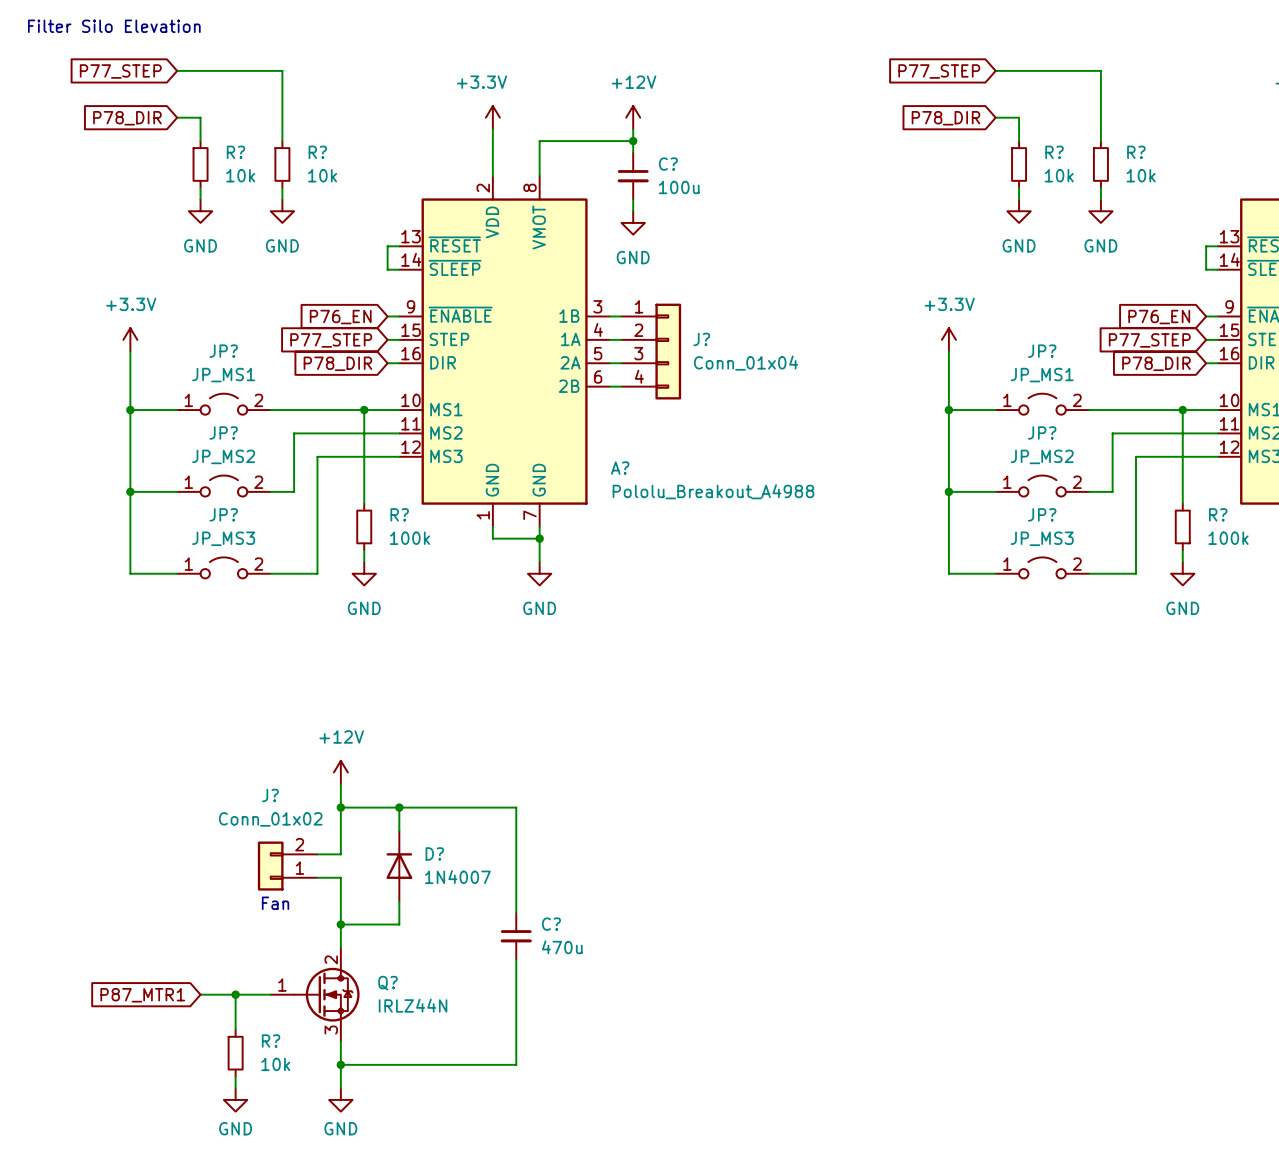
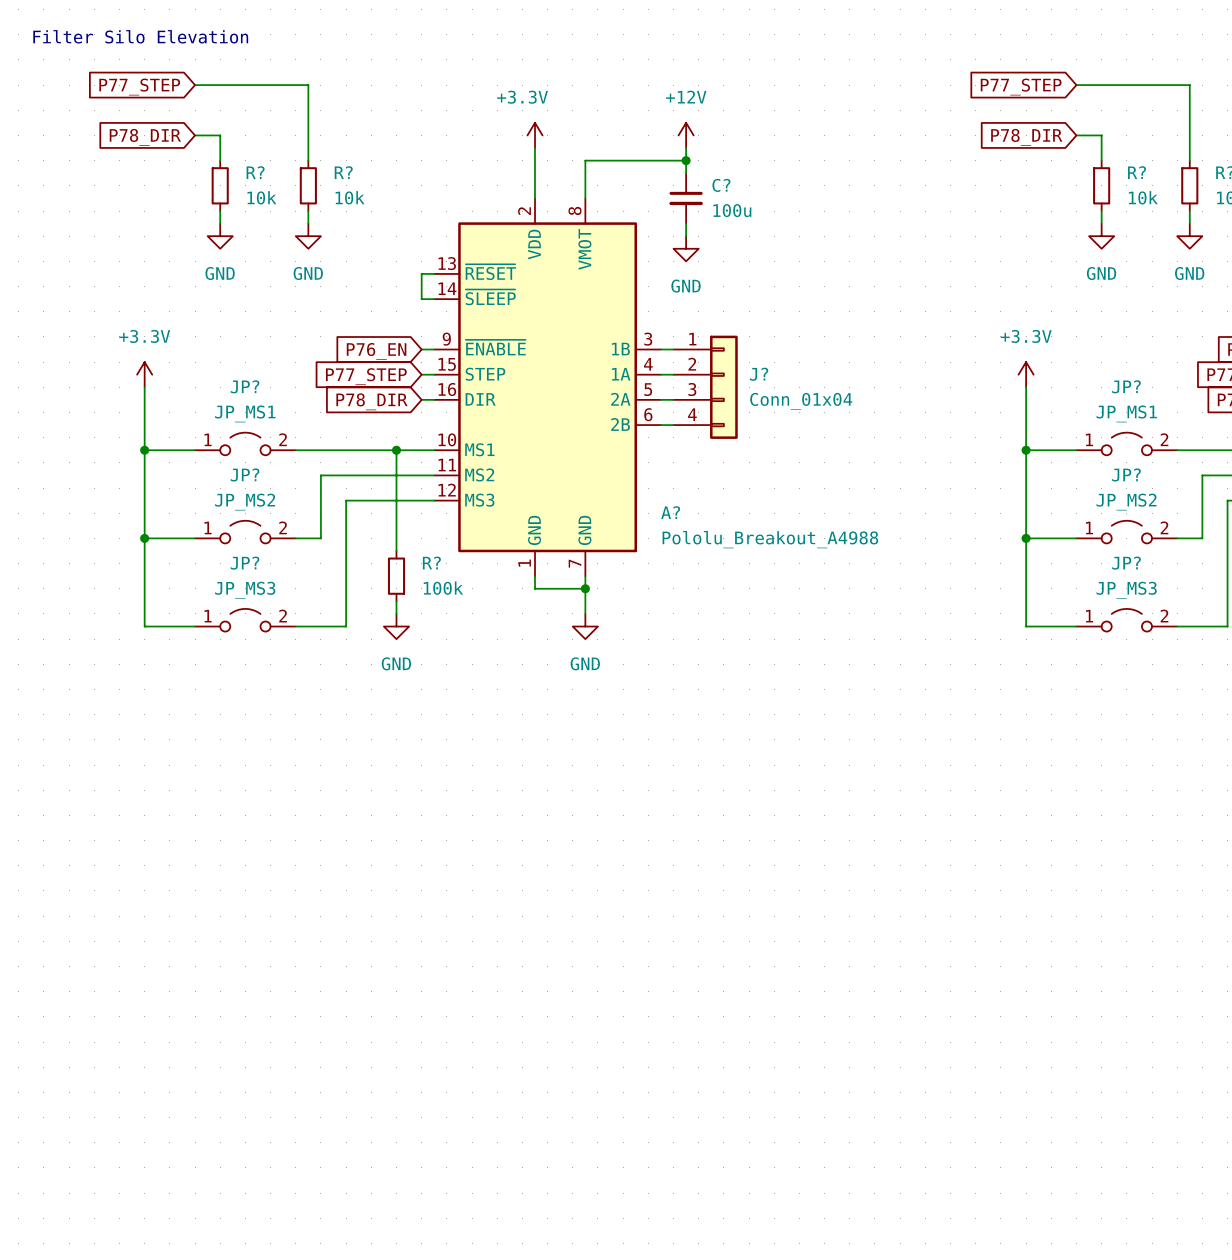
power symbol: +12V (340, 772) -> none
wire: (340, 784) (340, 854) (317, 854) -> none
wire: (340, 807) (516, 807) (516, 912) -> none
junction: (340, 807) -> none
wire: (399, 807) (399, 830) -> none
junction: (399, 807) -> none
J?: Conn_01x02 (287, 866) -> none
D?: 1N4007 (399, 866) -> none
wire: (317, 877) (340, 877) (340, 947) -> none
wire: (399, 901) (399, 924) (340, 924) -> none
text: Fan (275, 903) -> none
junction: (340, 924) -> none
C?: 470u (516, 936) -> none
wire: (516, 959) (516, 1064) (340, 1064) -> none
wire: (200, 994) (270, 994) -> none
wire: (235, 994) (235, 1029) -> none
junction: (235, 994) -> none
Q?: IRLZ44N (315, 994) -> none
global label: P87_MTR1 (142, 995) -> none
wire: (340, 1041) (340, 1088) -> none
R?: 10k (235, 1053) -> none
junction: (340, 1064) -> none
wire: (235, 1076) (235, 1088) -> none
power symbol: GND (235, 1099) -> none
power symbol: GND (340, 1099) -> none

